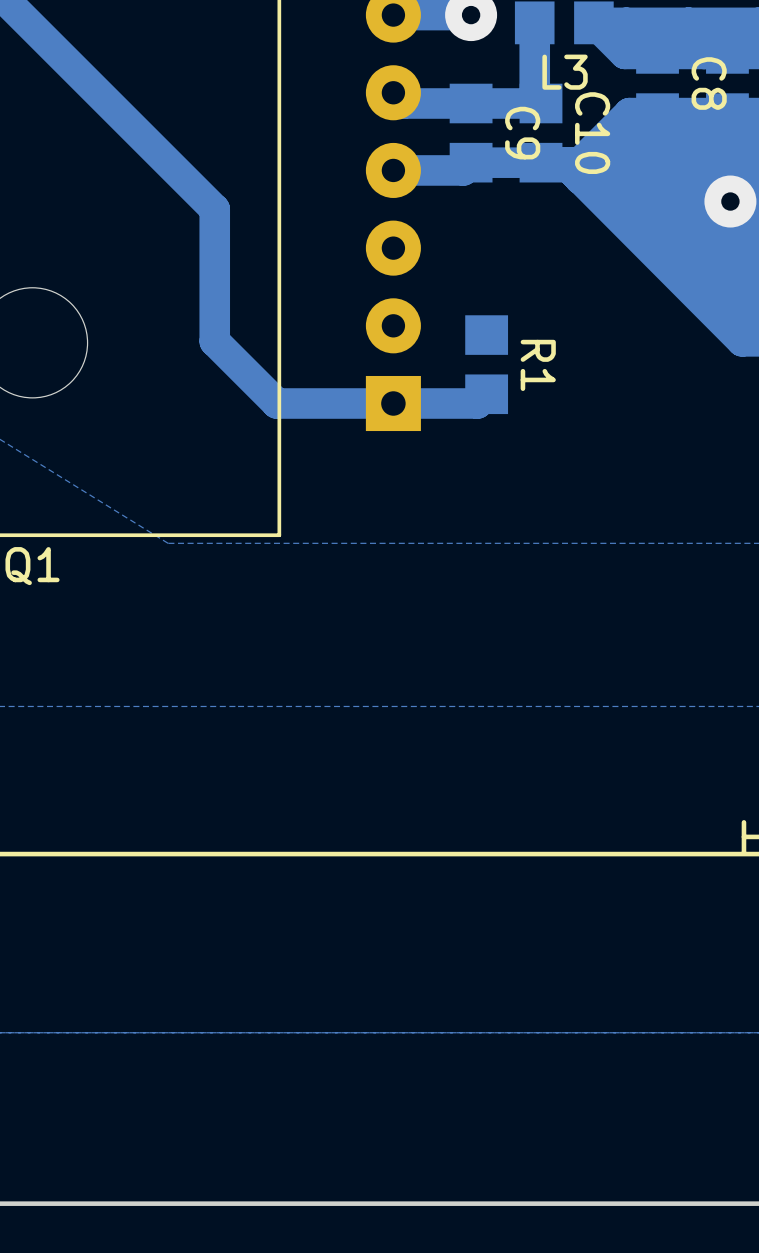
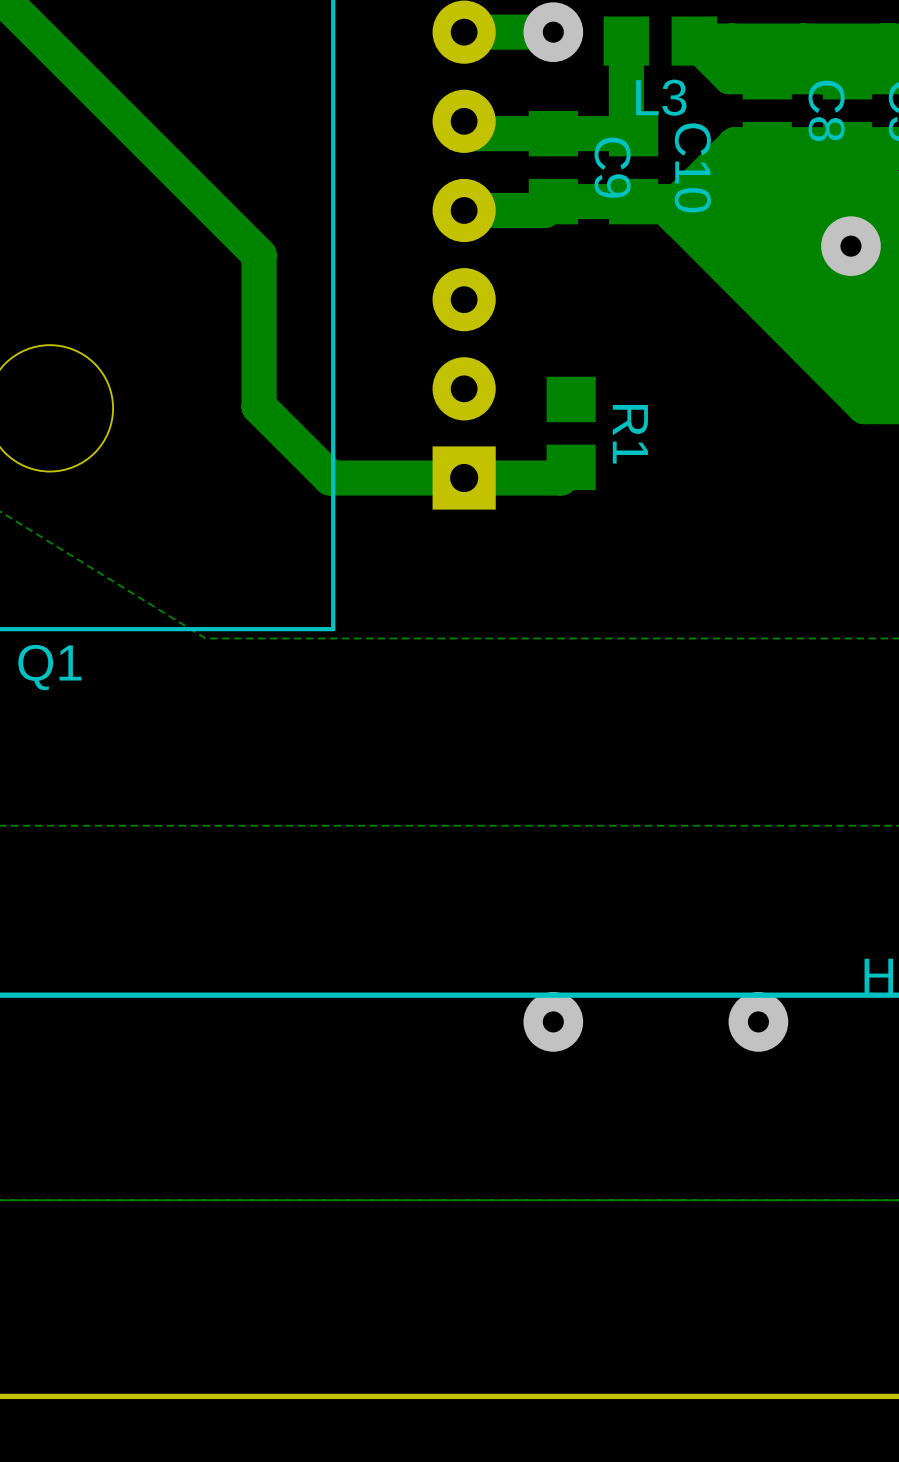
via: none -> (553, 1021)
via: none -> (758, 1021)

